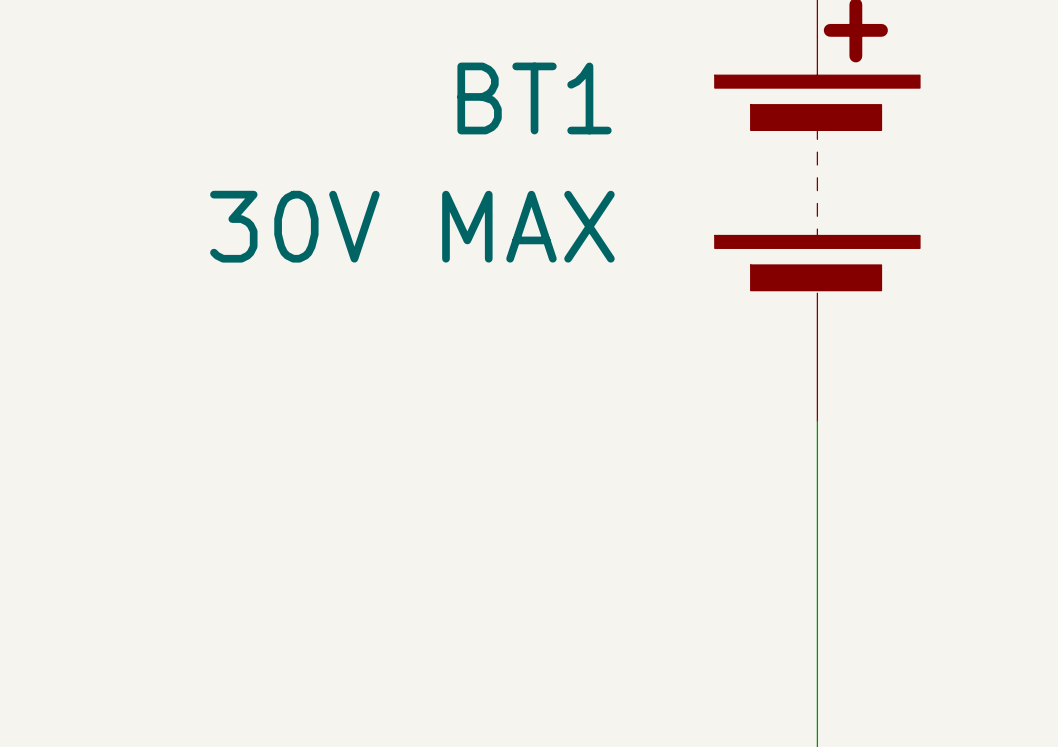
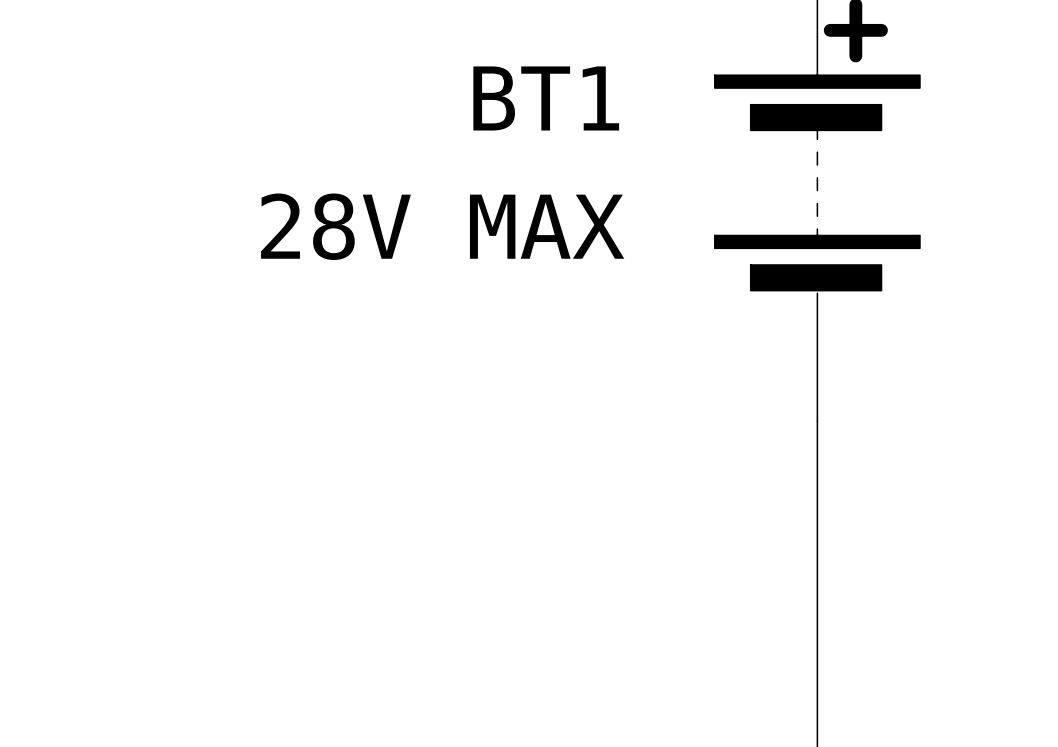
BT1 value: 30V MAX (412, 226) -> 28V MAX (442, 226)

